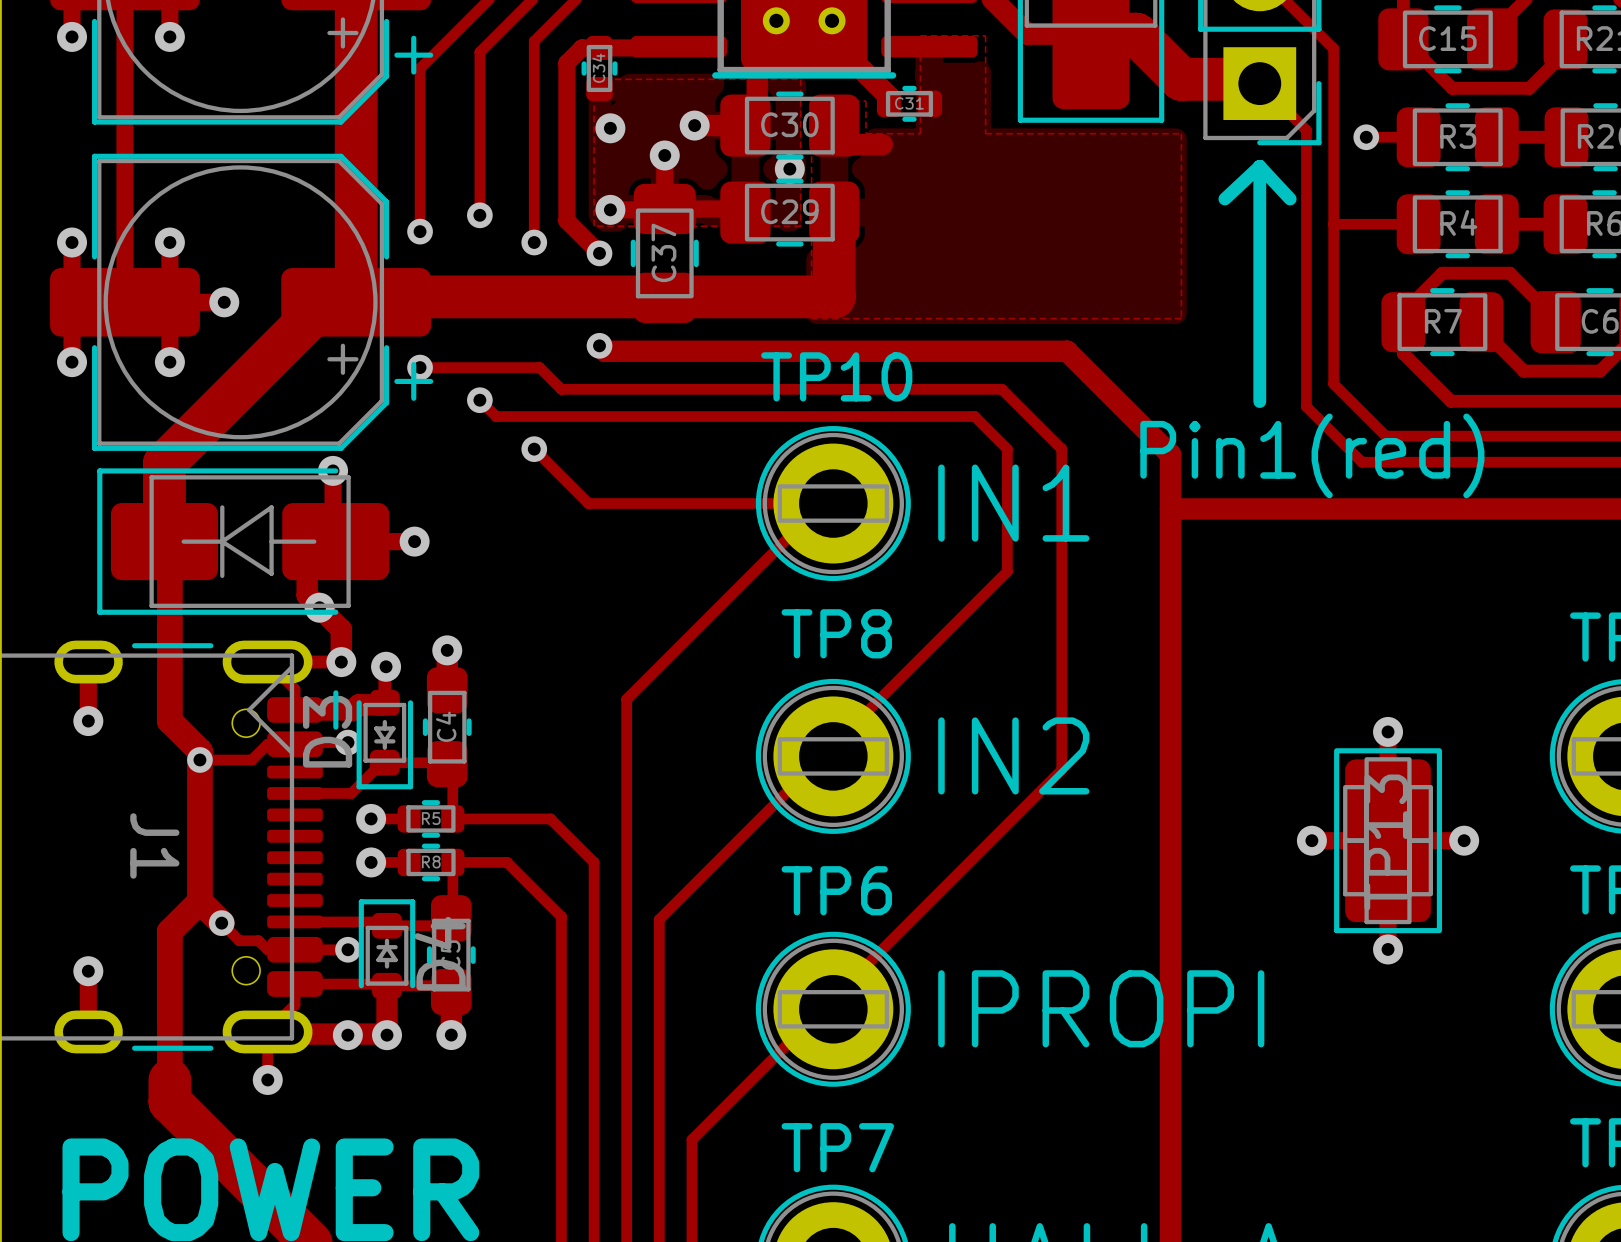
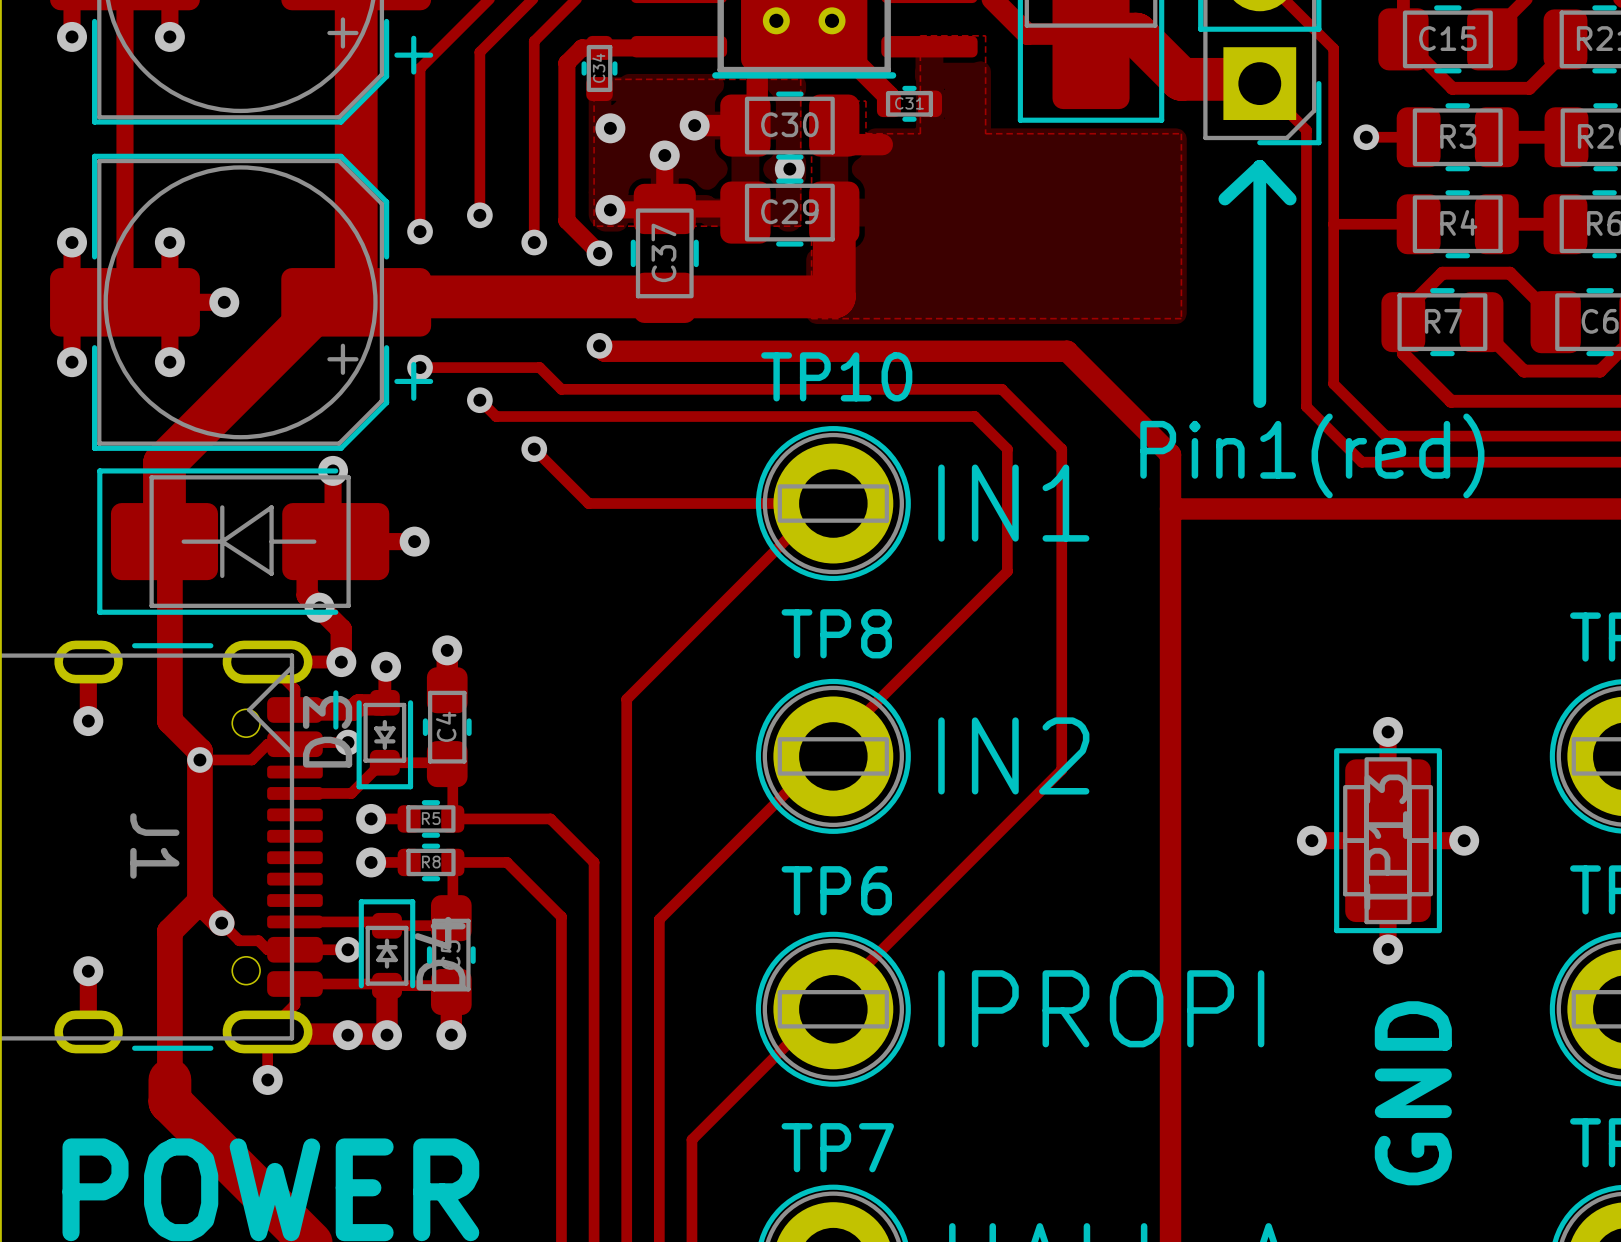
text: none -> GND (1413, 1093)

